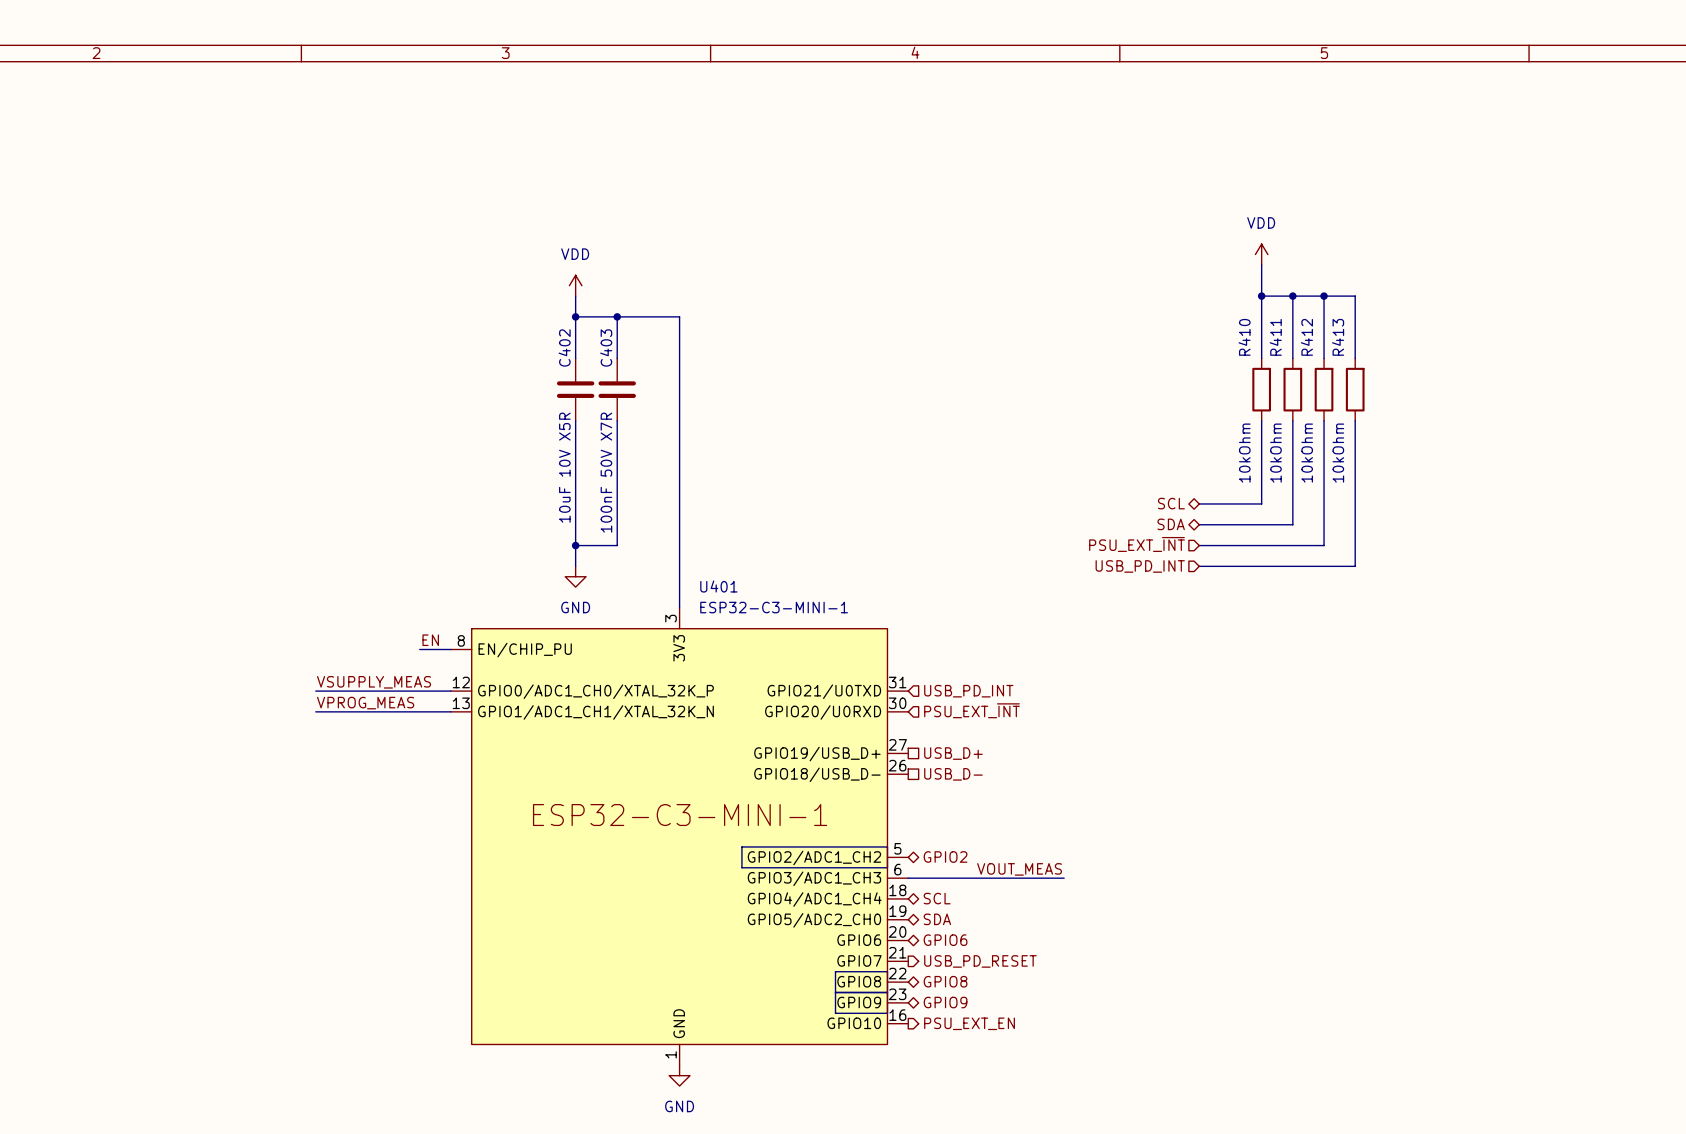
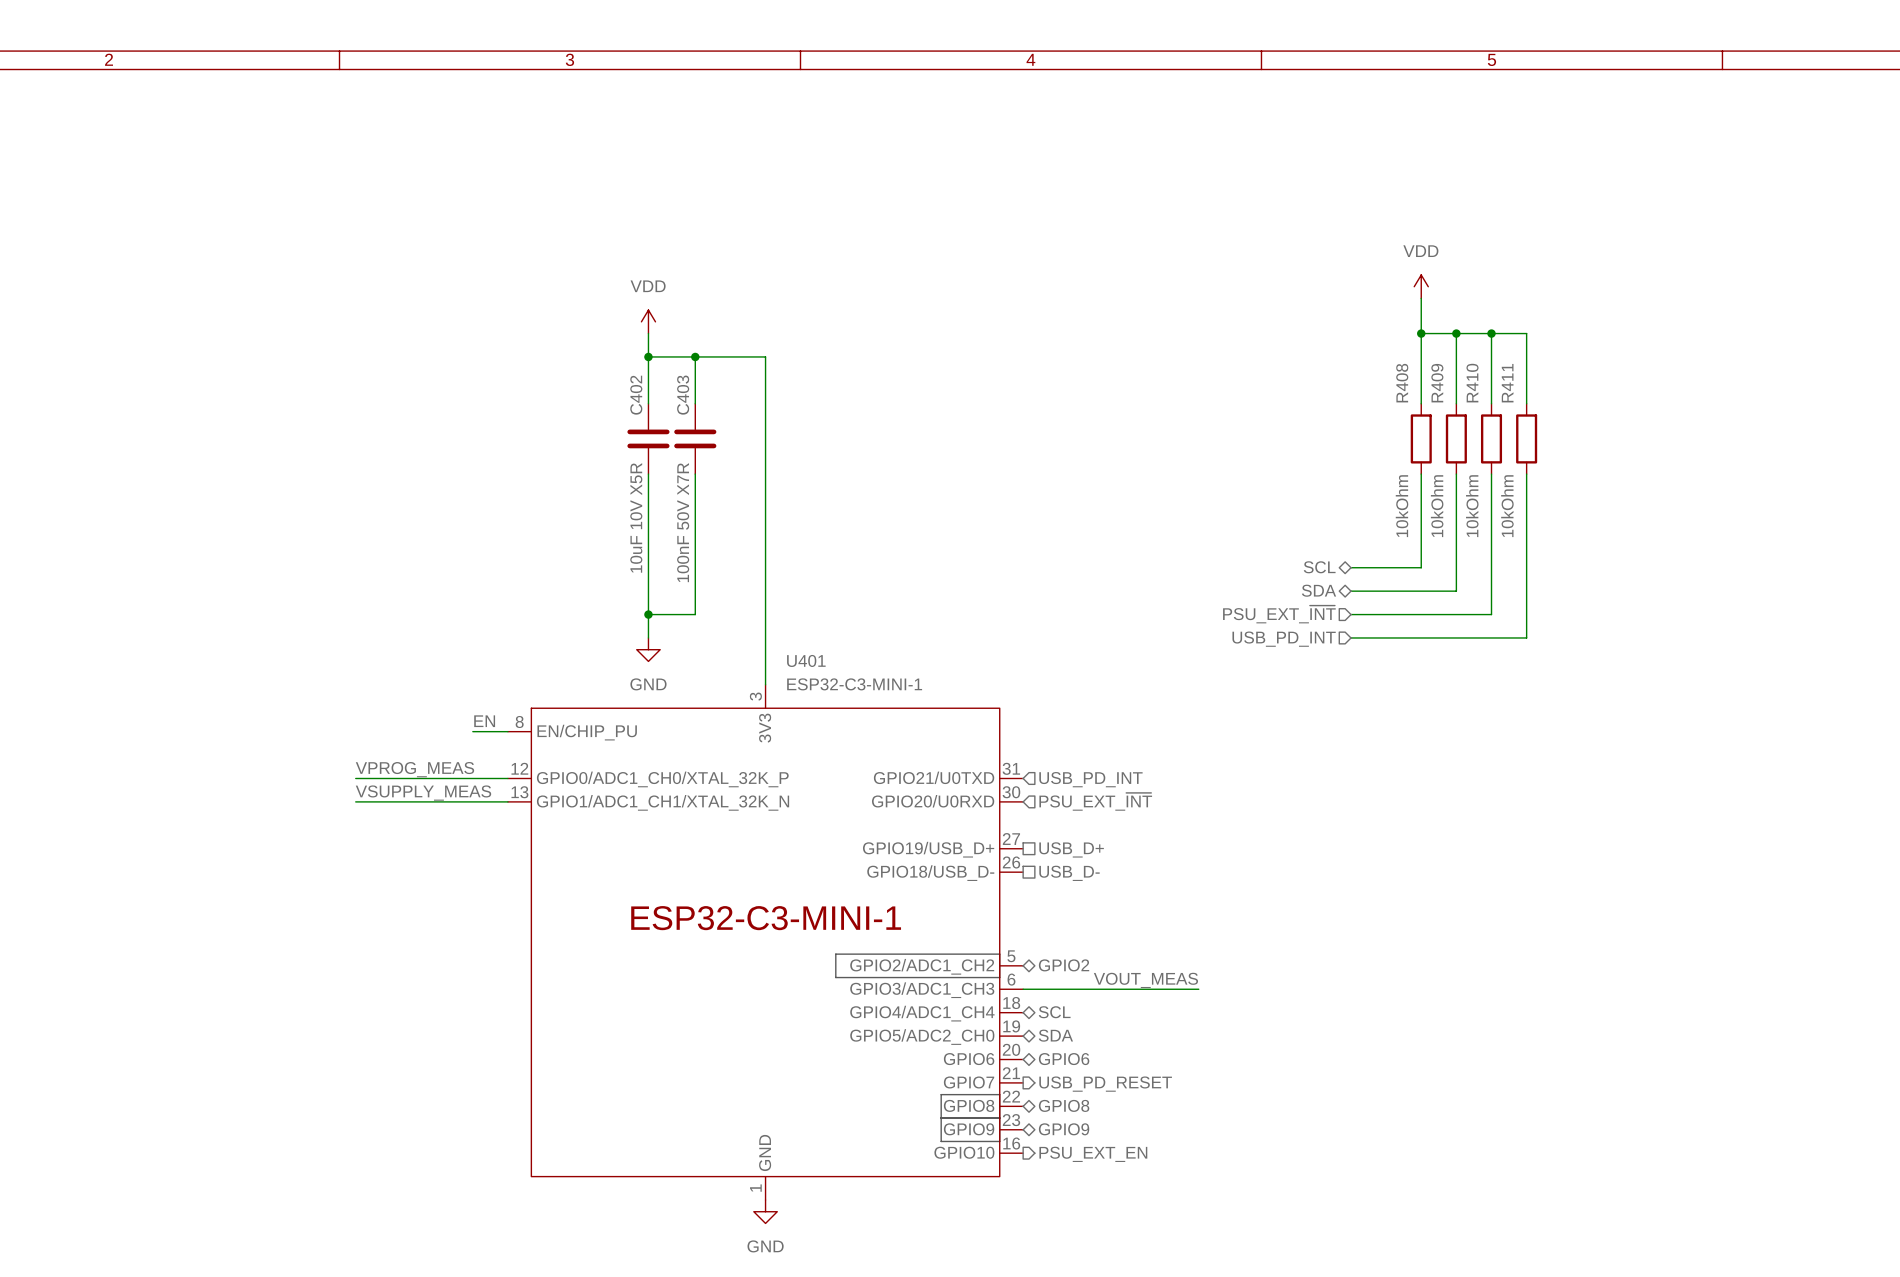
R410 name: R410 (1244, 337) -> R408 (1402, 383)
R411 name: R411 (1275, 337) -> R409 (1437, 383)
R412 name: R412 (1306, 337) -> R410 (1472, 383)
R413 name: R413 (1338, 337) -> R411 (1507, 383)
label: VSUPPLY_MEAS (374, 682) -> VPROG_MEAS (414, 769)
label: VPROG_MEAS (365, 703) -> VSUPPLY_MEAS (423, 793)

